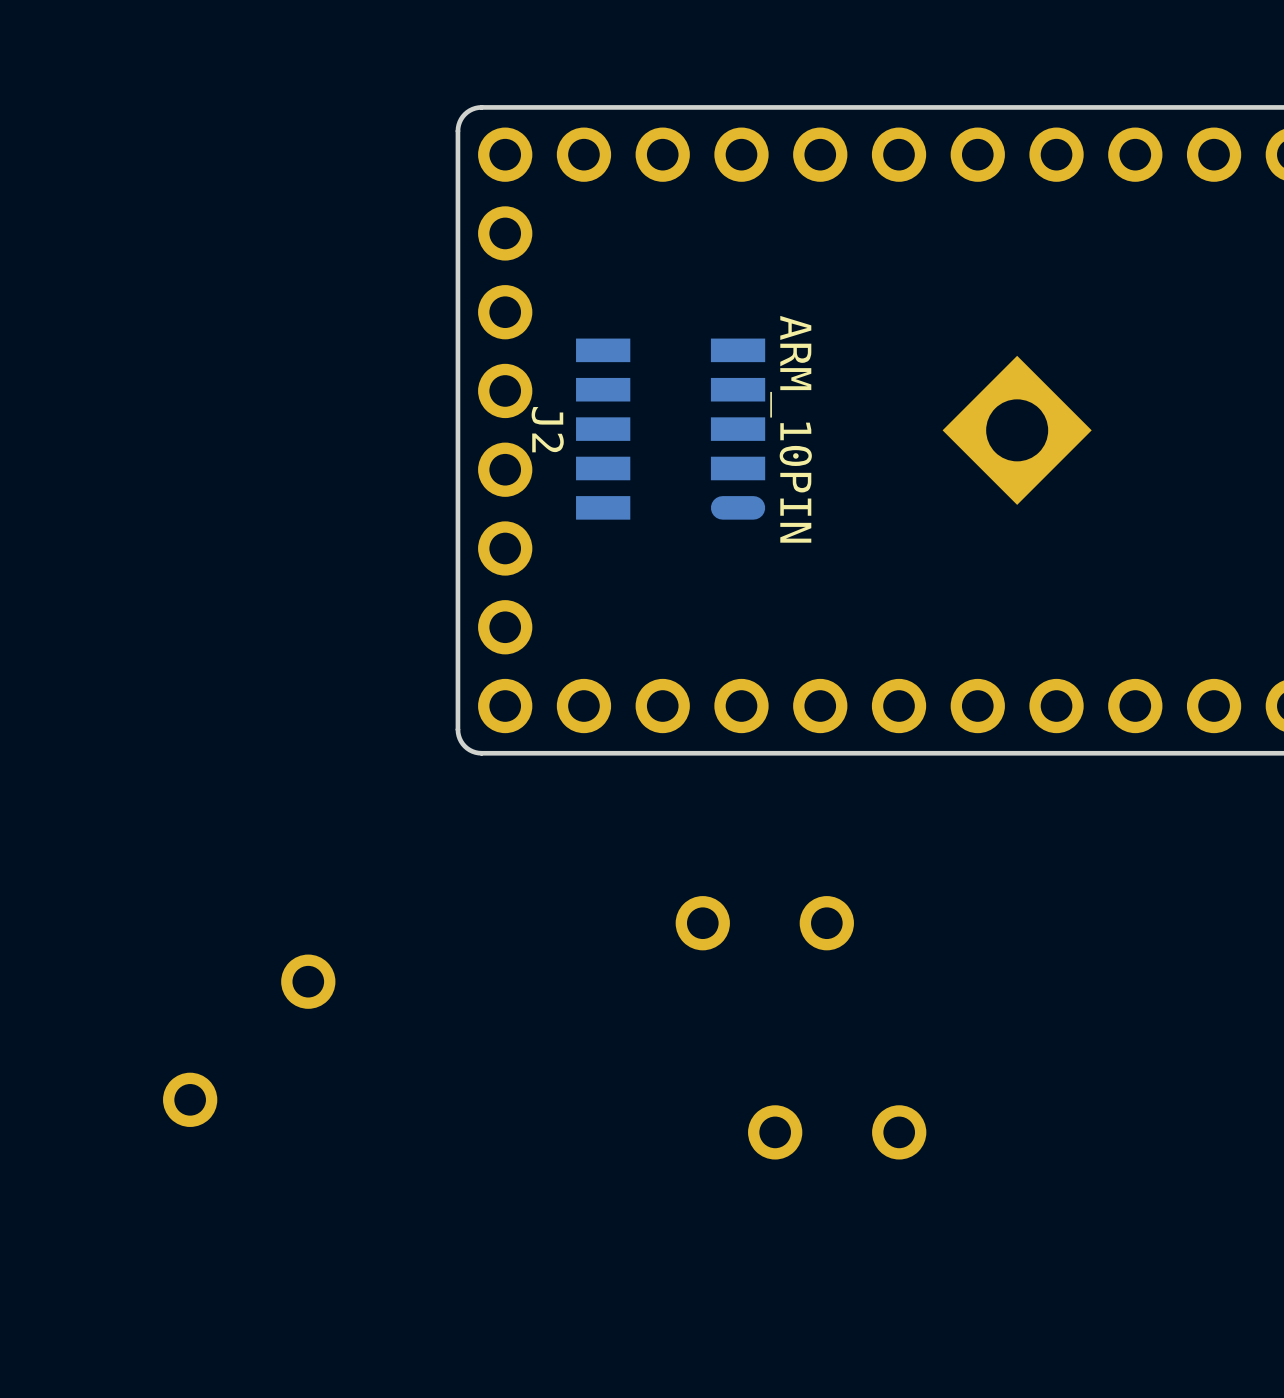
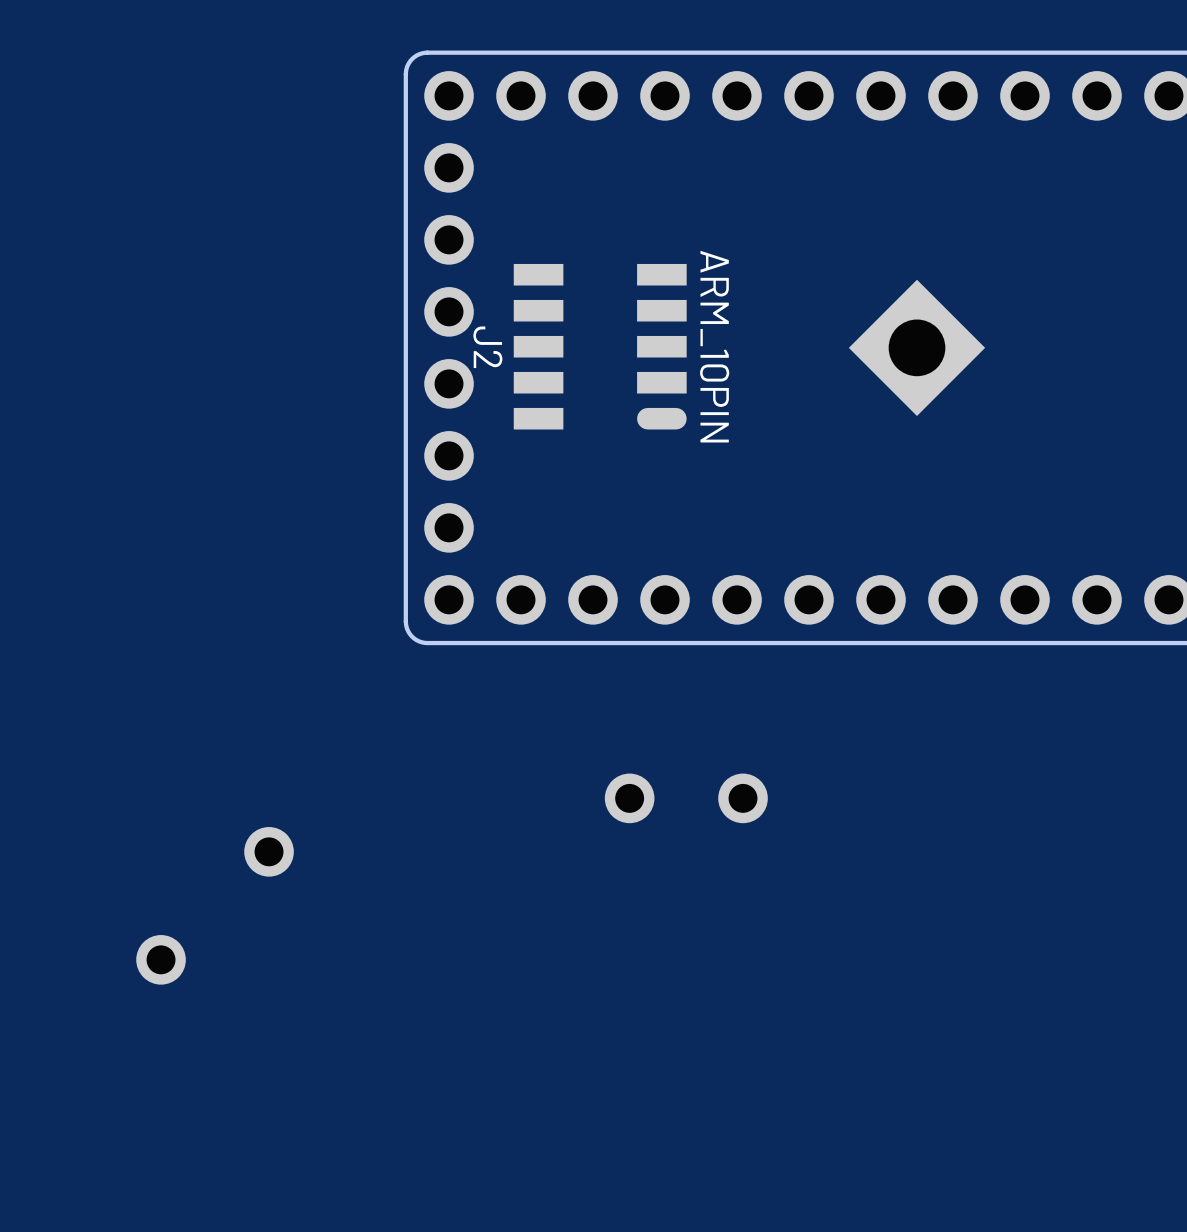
part: (775, 1132) -> none
part: (899, 1132) -> none

